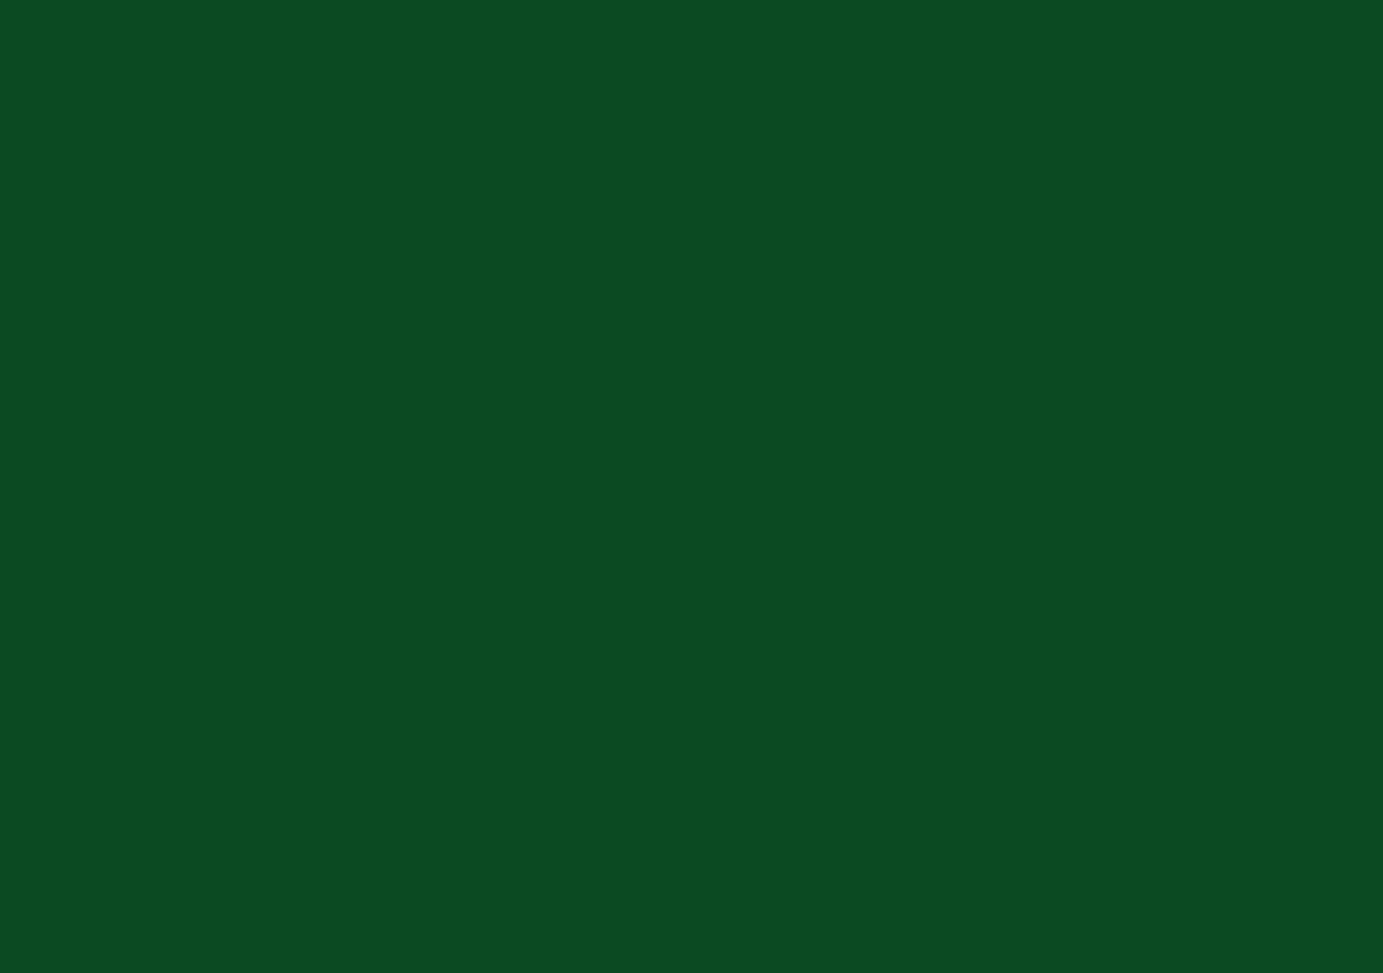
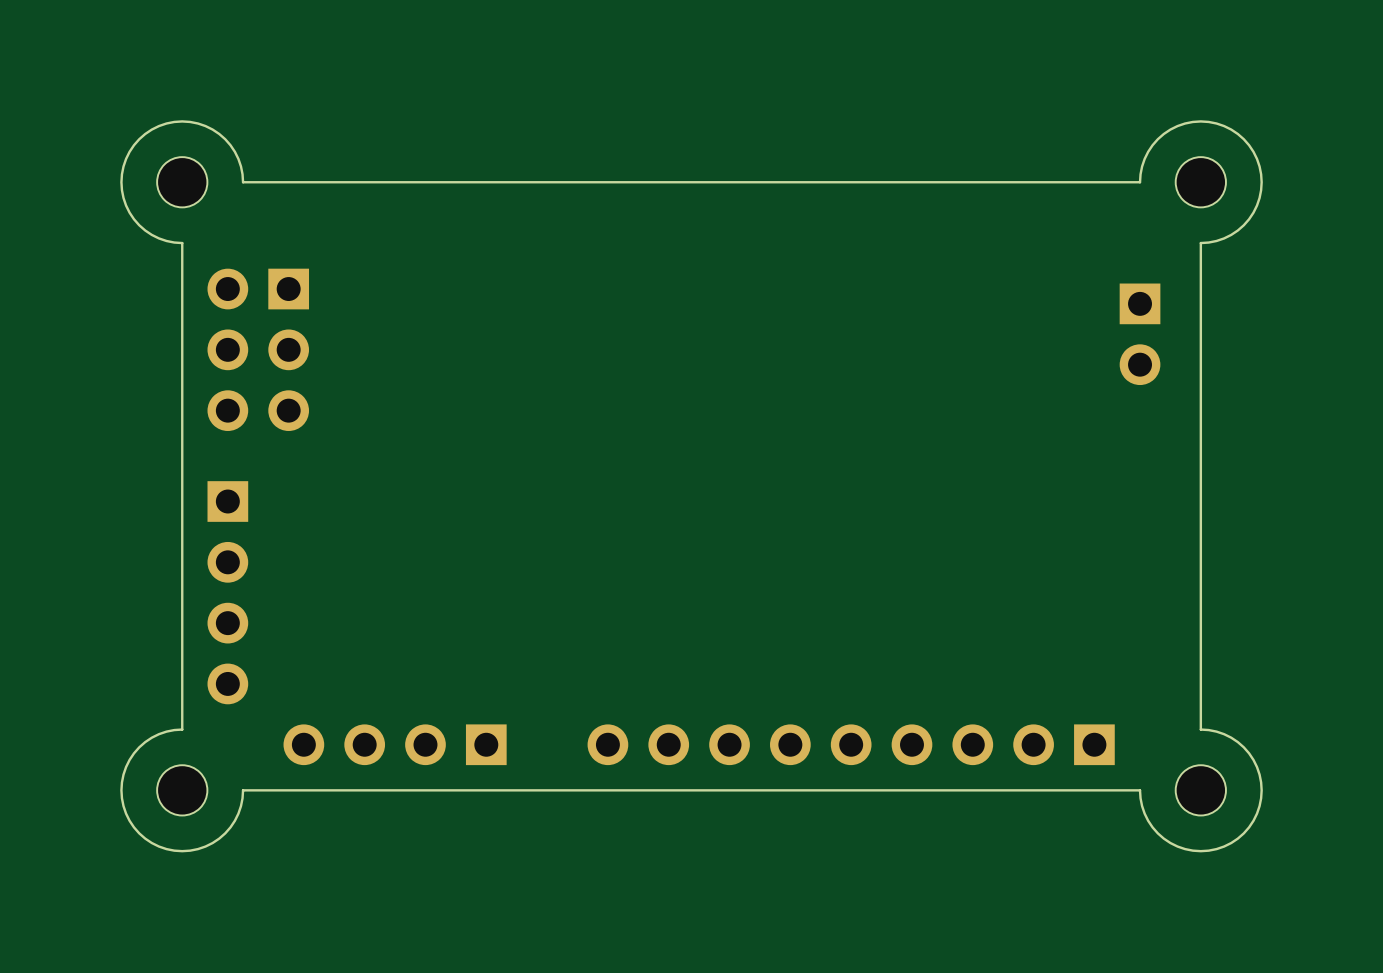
part: none -> (182, 182)
board edge: none -> (1140, 182) (243, 182) (240, 166) (234, 151) (225, 139) (212, 129) (197, 123) (182, 121) (166, 123) (151, 129) (139, 139) (129, 151) (123, 166) (121, 182) (126, 205) (139, 225) (158, 238) (182, 243) (182, 729) (166, 731) (151, 737) (139, 747) (129, 759) (123, 774) (121, 790) (123, 806) (129, 820) (139, 833) (151, 843) (166, 849) (182, 851) (205, 846) (225, 833) (238, 813) (243, 790) (1140, 790) (1142, 806) (1148, 820) (1157, 833) (1170, 843) (1185, 849) (1200, 851) (1216, 849) (1231, 843) (1243, 833) (1253, 820) (1259, 806) (1261, 790) (1257, 767) (1243, 747) (1224, 734) (1200, 729) (1200, 243) (1224, 238) (1243, 225) (1253, 212) (1259, 197) (1261, 174) (1253, 151) (1237, 134) (1216, 123) (1200, 121) (1177, 126) (1157, 139) (1144, 158) (1140, 182)
part: none -> (1200, 182)
part: none -> (1140, 334)
part: none -> (258, 349)
part: none -> (227, 592)
part: none -> (395, 744)
part: none -> (851, 744)
part: none -> (182, 790)
part: none -> (1200, 790)

